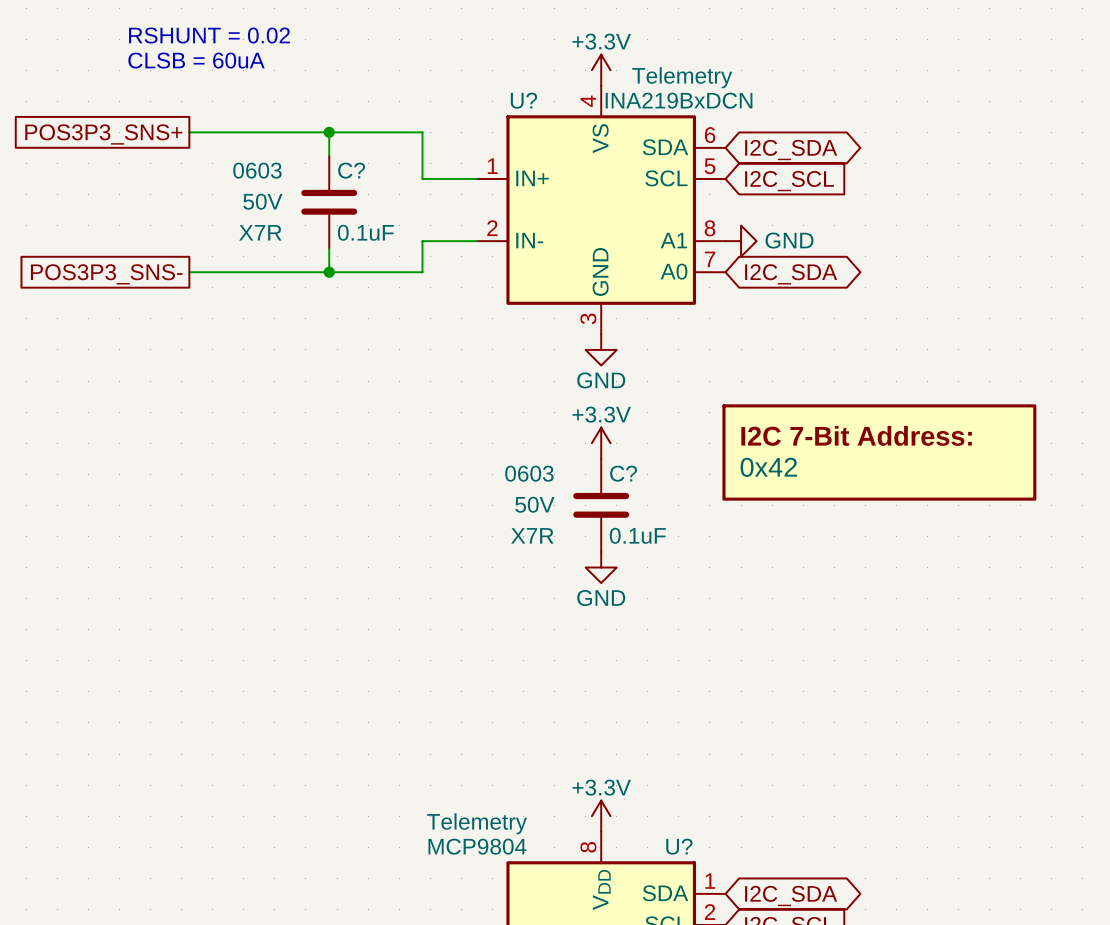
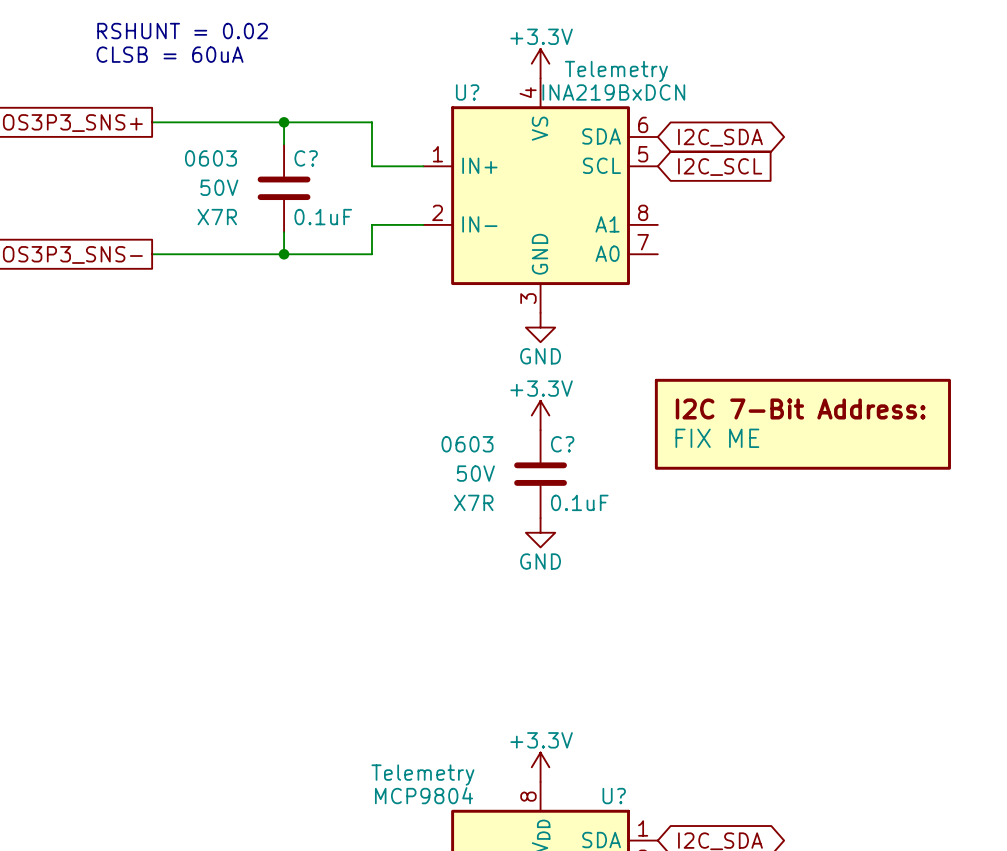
power symbol: GND (741, 241) -> none
global label: I2C_SDA (791, 274) -> none
part value: 0x42 (768, 467) -> FIX ME (717, 438)

